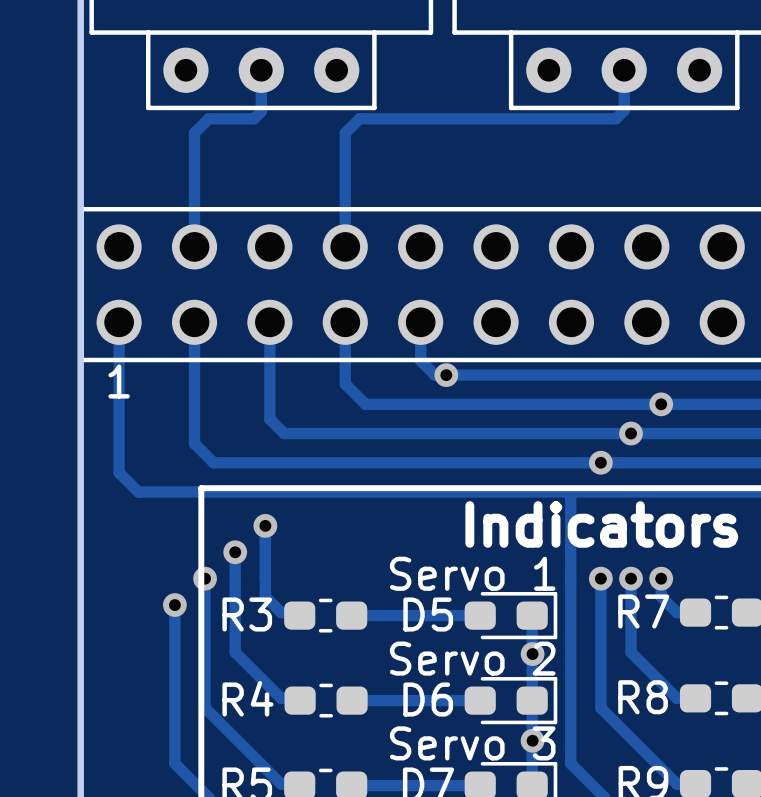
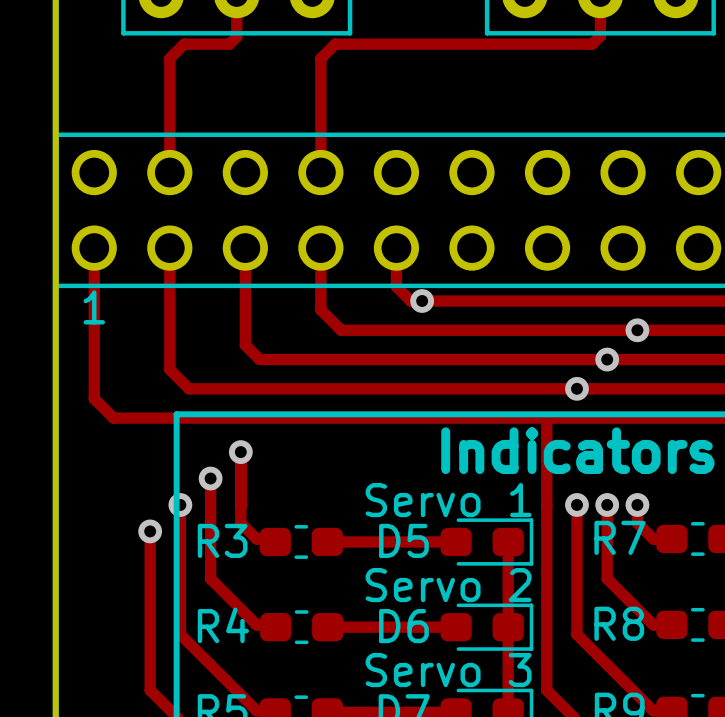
via: (532, 654) -> none
via: (532, 740) -> none

